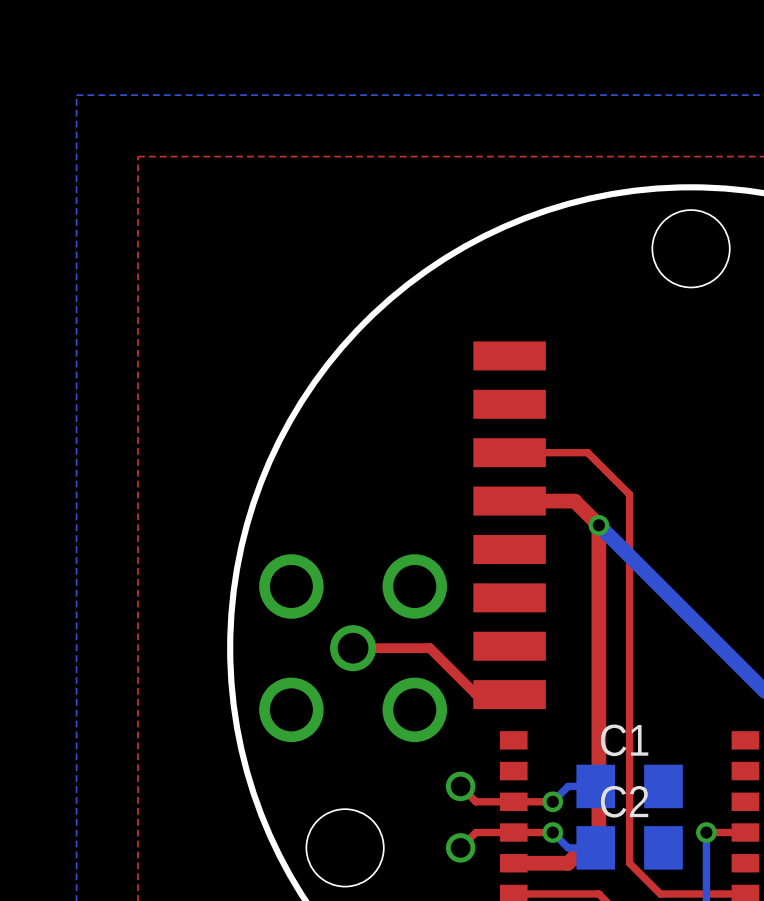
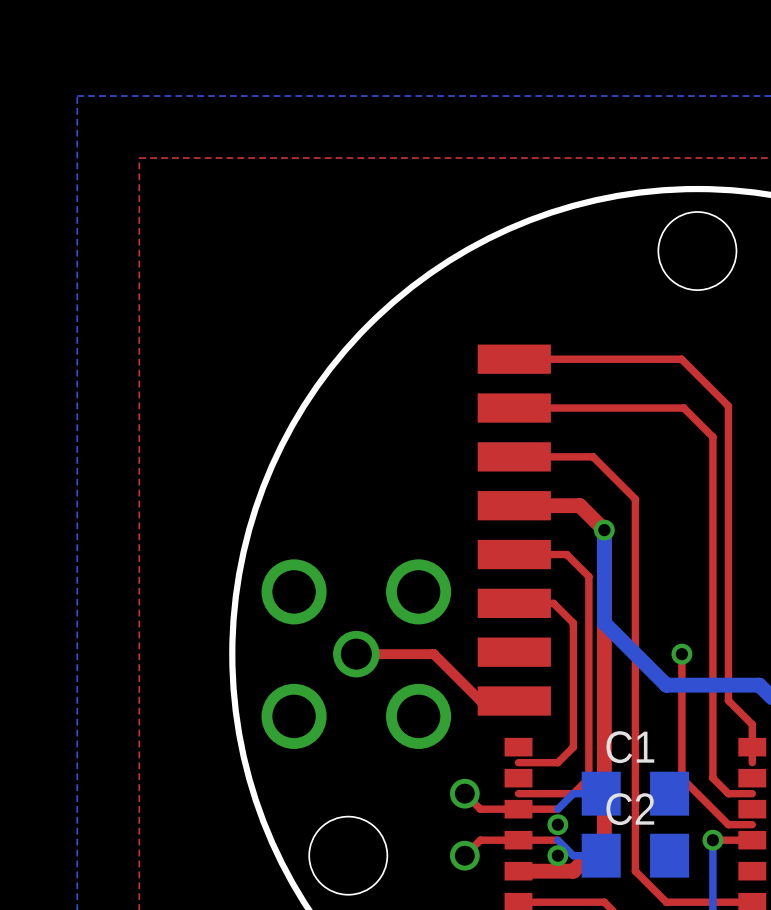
top track: none -> (514, 359) (681, 359) (728, 406) (728, 700) (752, 724) (752, 762)
top track: none -> (514, 408) (683, 408) (712, 437) (712, 778) (728, 793) (752, 793)
bottom track: (598, 525) (752, 678) -> (604, 530) (604, 623) (666, 685) (759, 685)
top track: none -> (514, 554) (566, 554) (588, 576) (588, 778) (573, 793) (518, 793)
top track: none -> (514, 603) (553, 603) (573, 623) (573, 747) (557, 762) (518, 762)
top track: none -> (681, 654) (681, 778) (728, 824) (752, 824)
via: none -> (681, 654)
via: (552, 801) -> none
via: none -> (557, 824)
via: (552, 832) -> none
via: none -> (557, 855)

